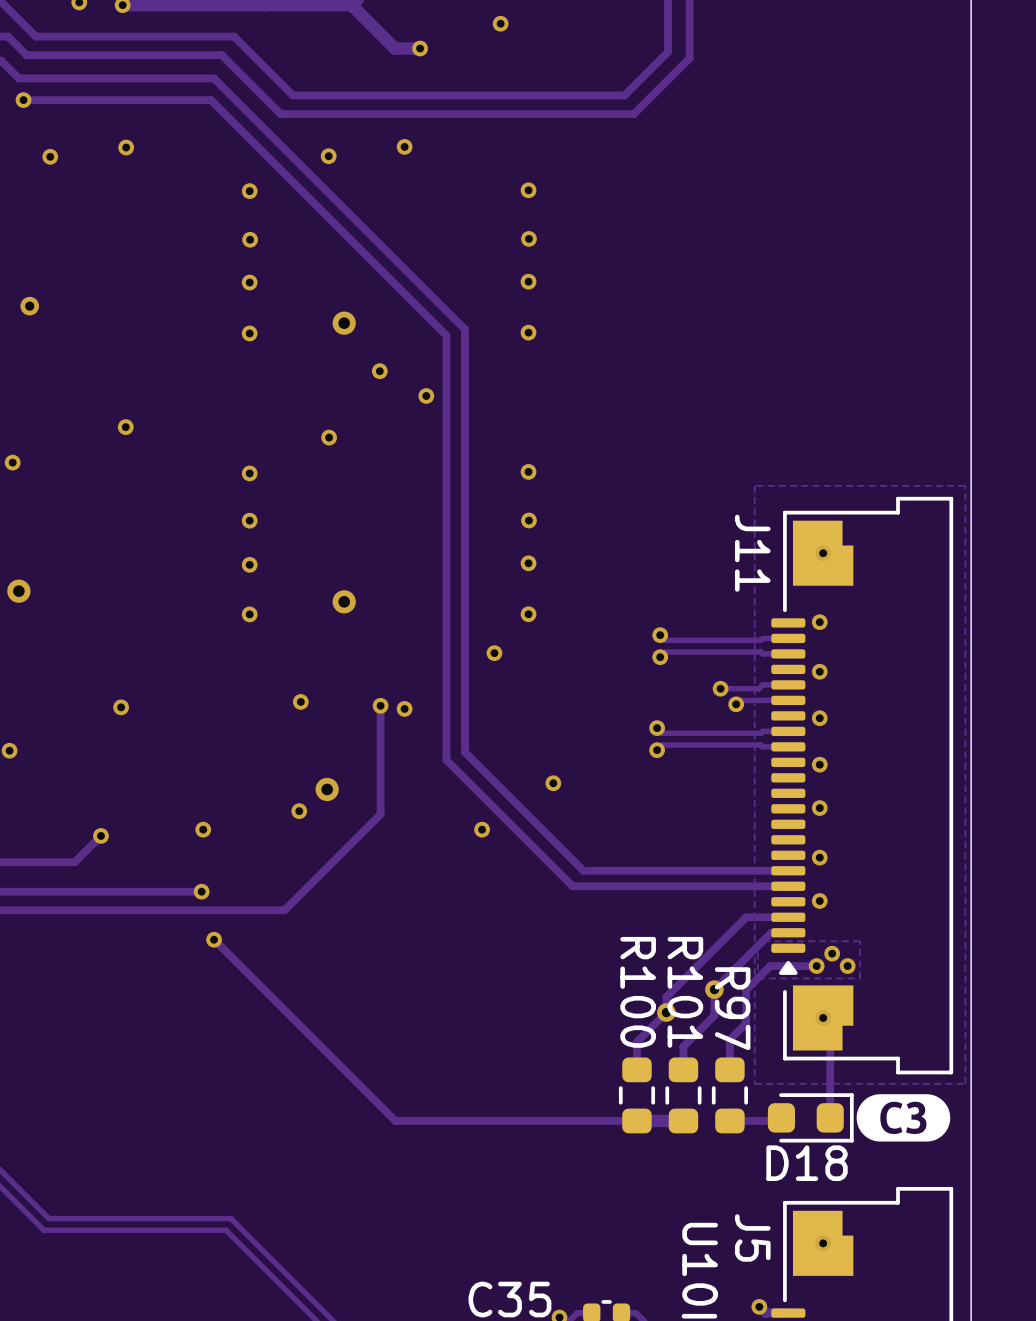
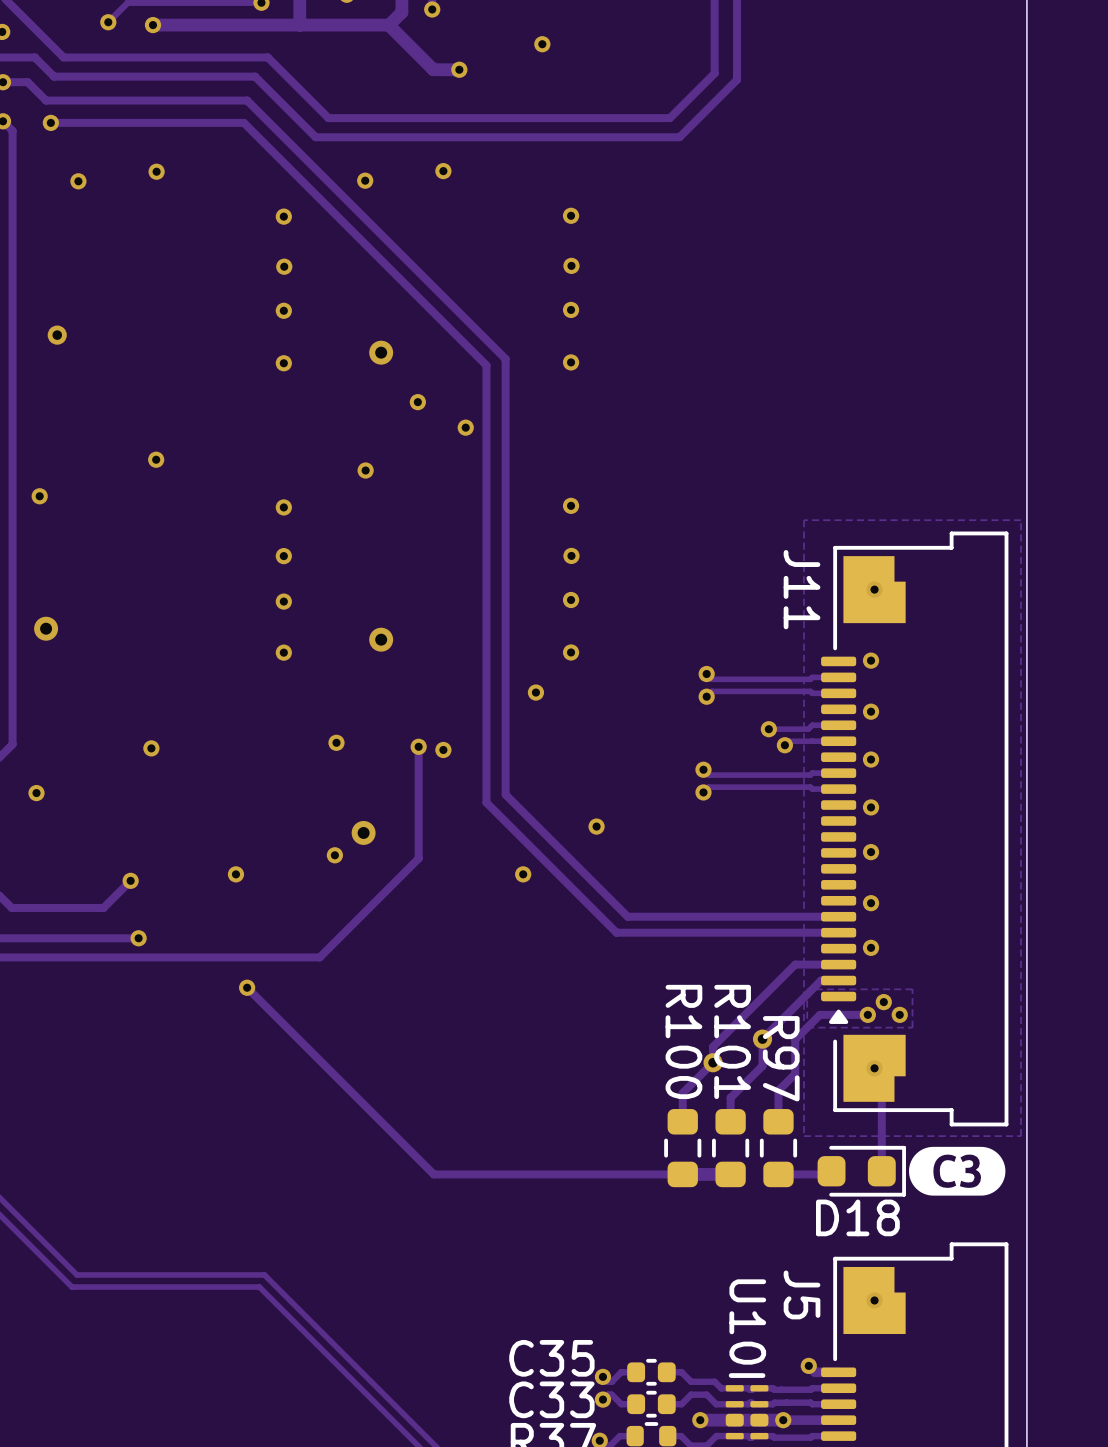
track: (201, 891) (108, 891) -> none
via position: (201, 891) -> (138, 938)

